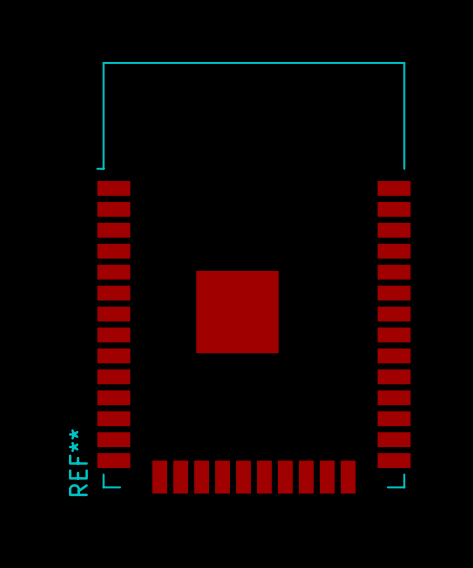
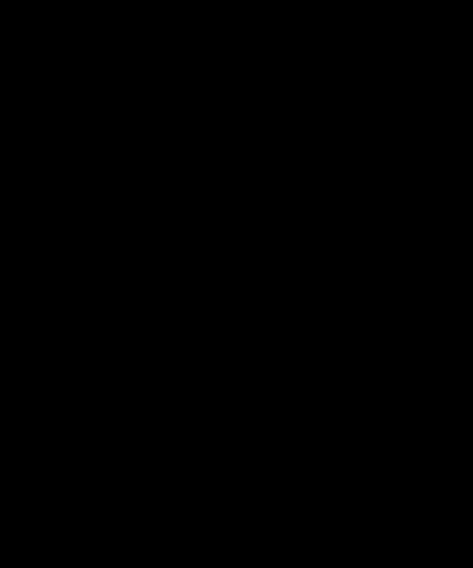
REF**: (253, 277) -> none

